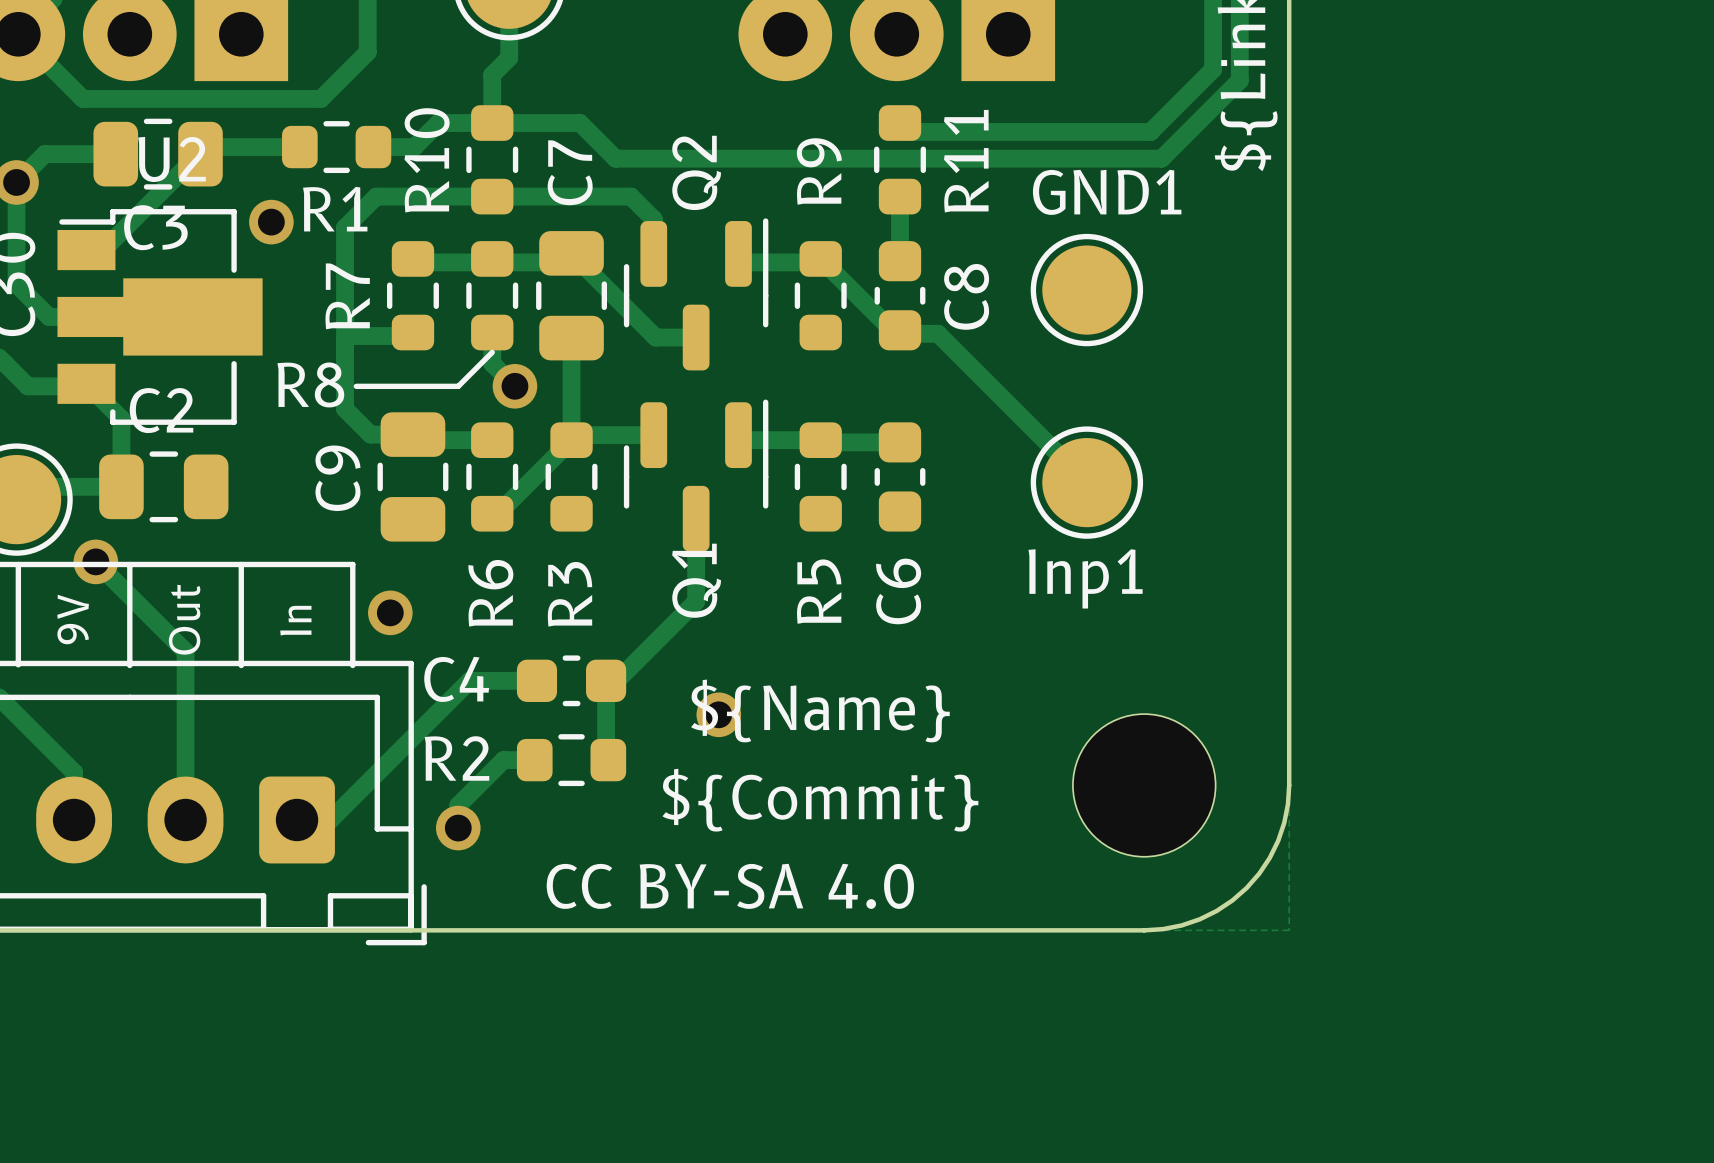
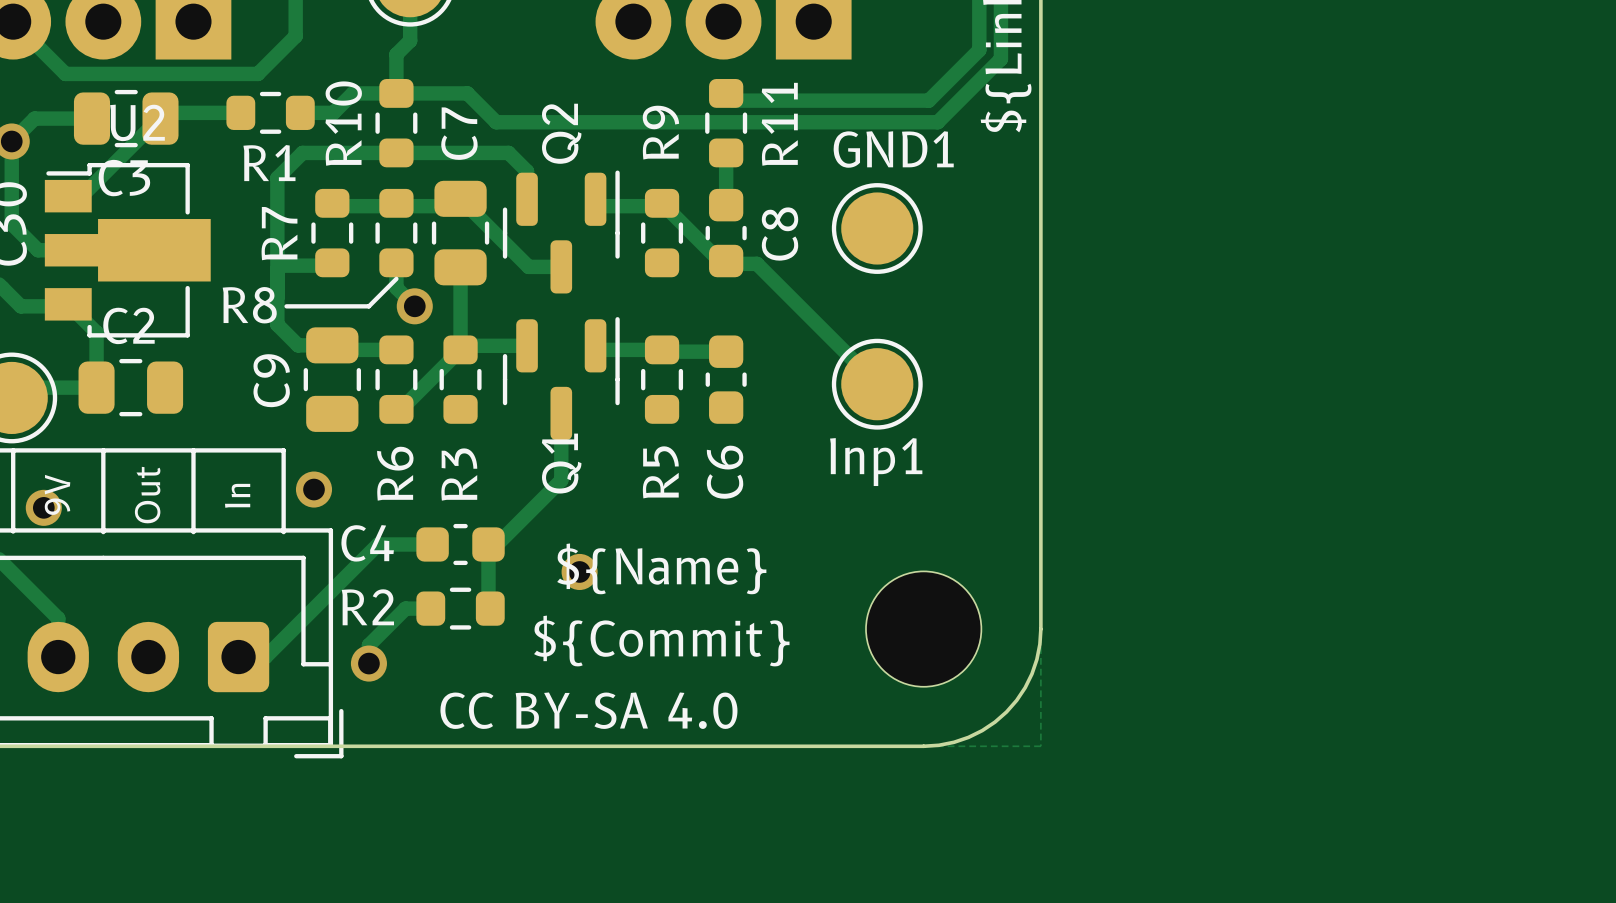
via: (271, 222) -> none
track: (95, 561) (185, 651) (185, 819) -> none
via position: (95, 561) -> (43, 507)

